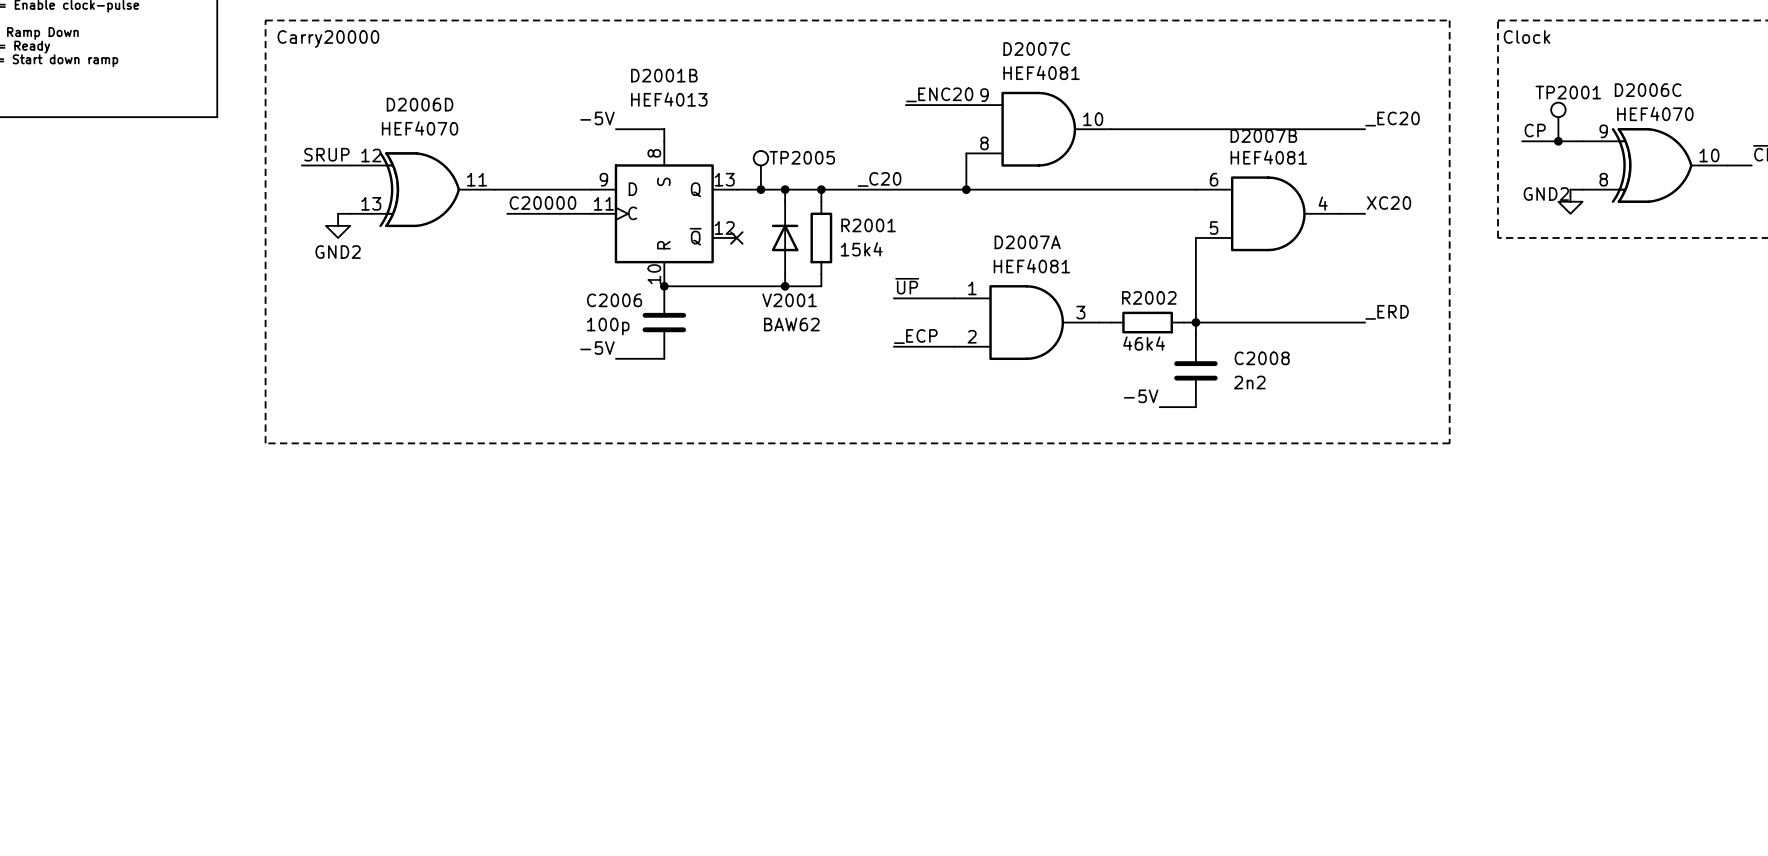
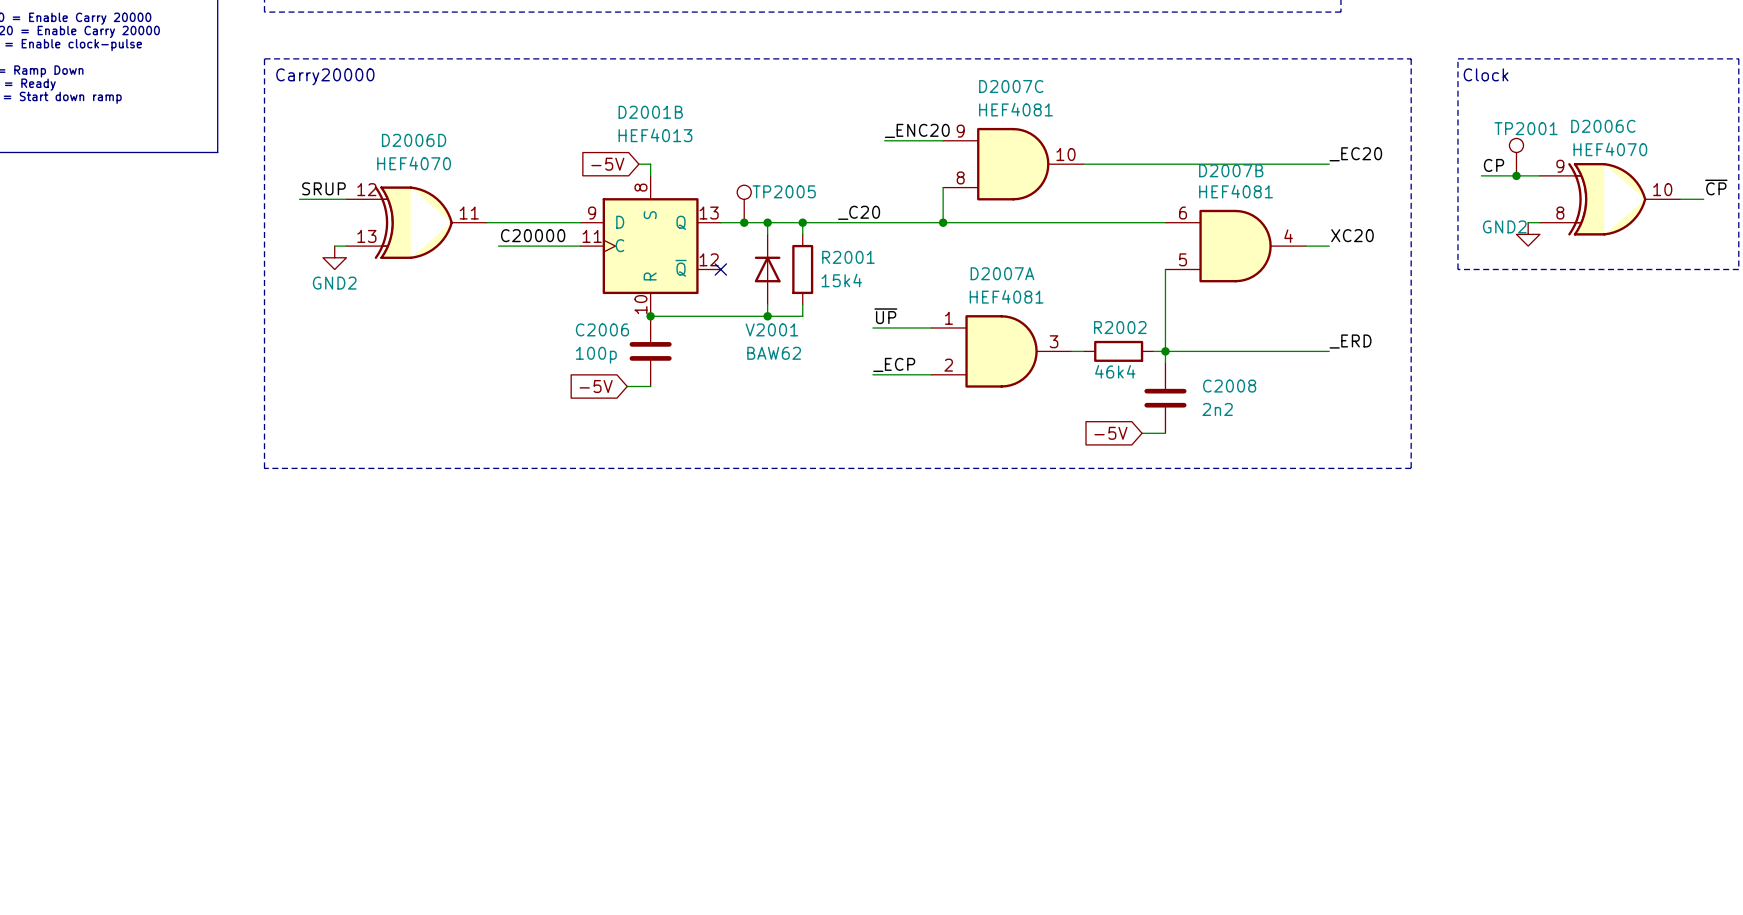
label: -5V (597, 118) -> none
wire: (615, 129) (652, 129) -> none
global label: none -> -5V (607, 164)
label: -5V (597, 348) -> none
global label: none -> -5V (596, 386)
wire: (615, 358) (640, 358) -> none
label: -5V (1141, 396) -> none
global label: none -> -5V (1110, 433)
wire: (1159, 407) (1171, 407) -> none

